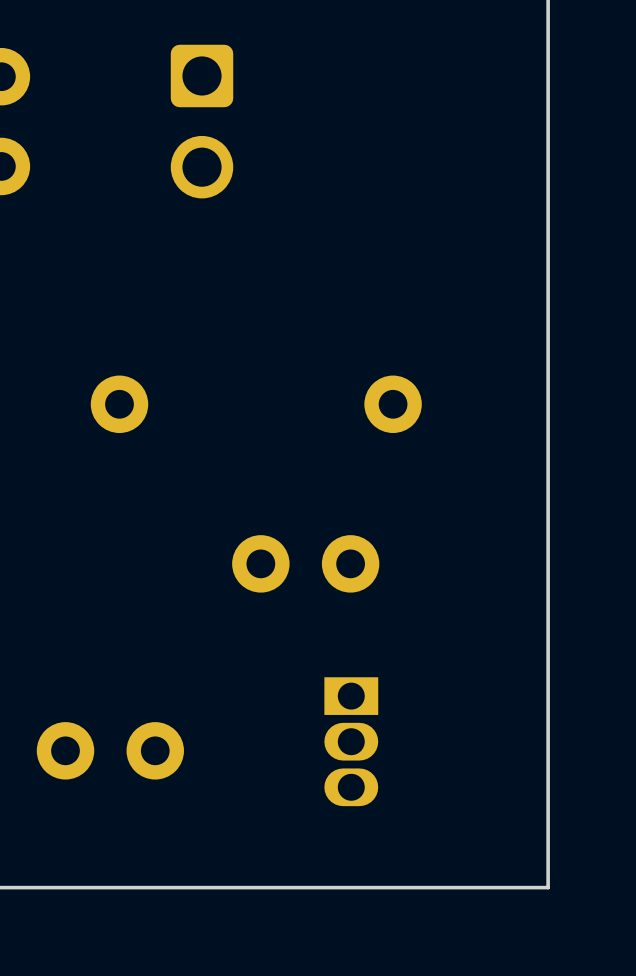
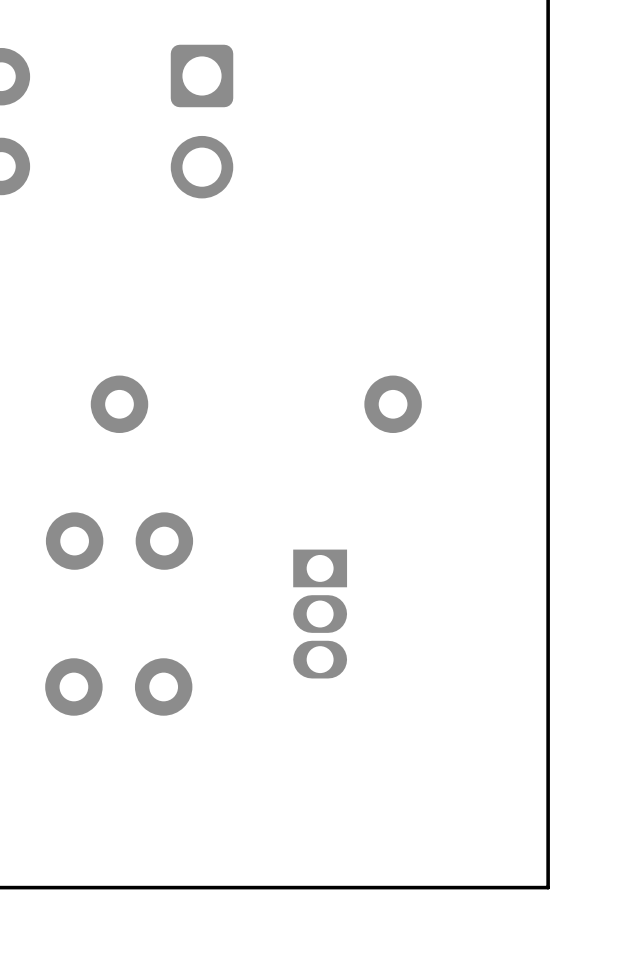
part: none -> (119, 541)
part: (305, 563) -> none
part position: (351, 741) -> (320, 614)
part position: (110, 750) -> (118, 686)

